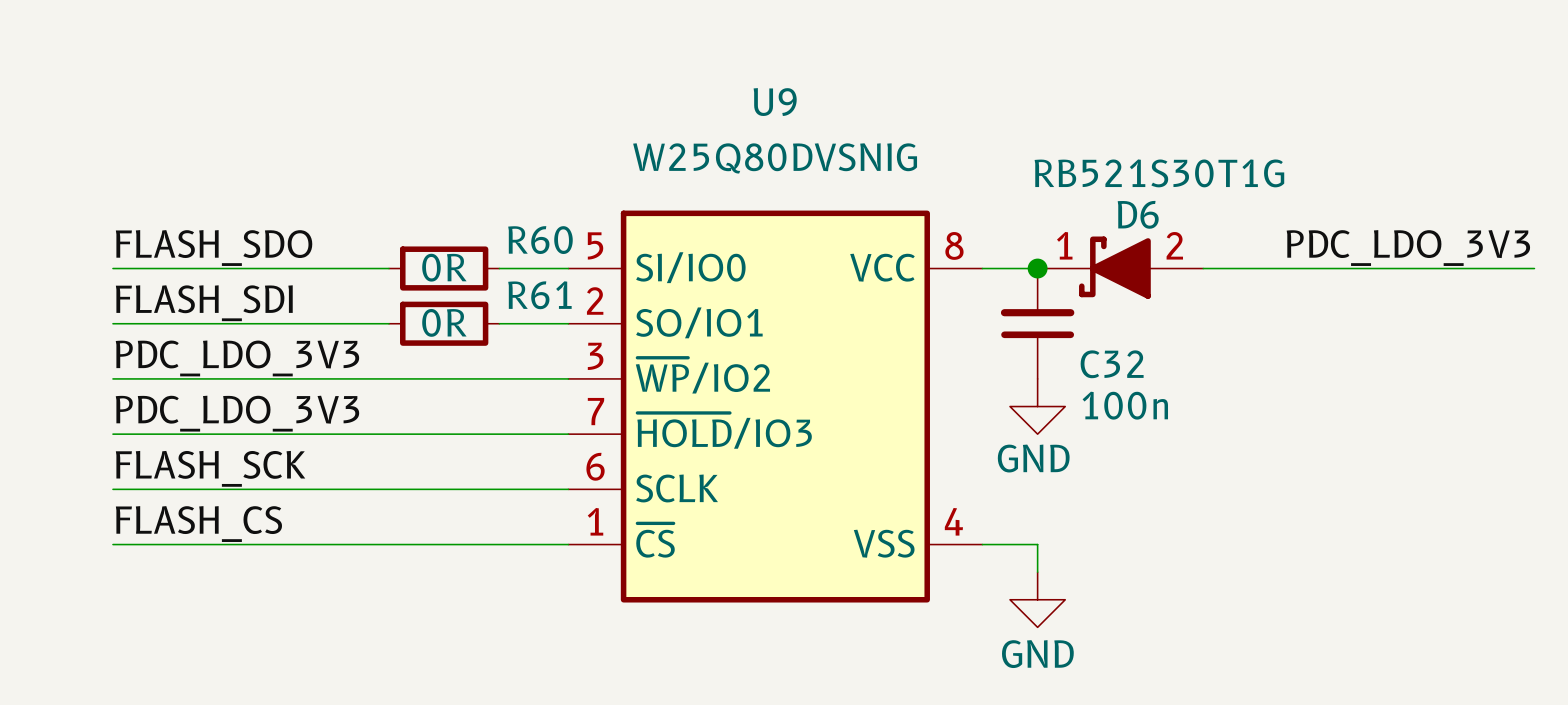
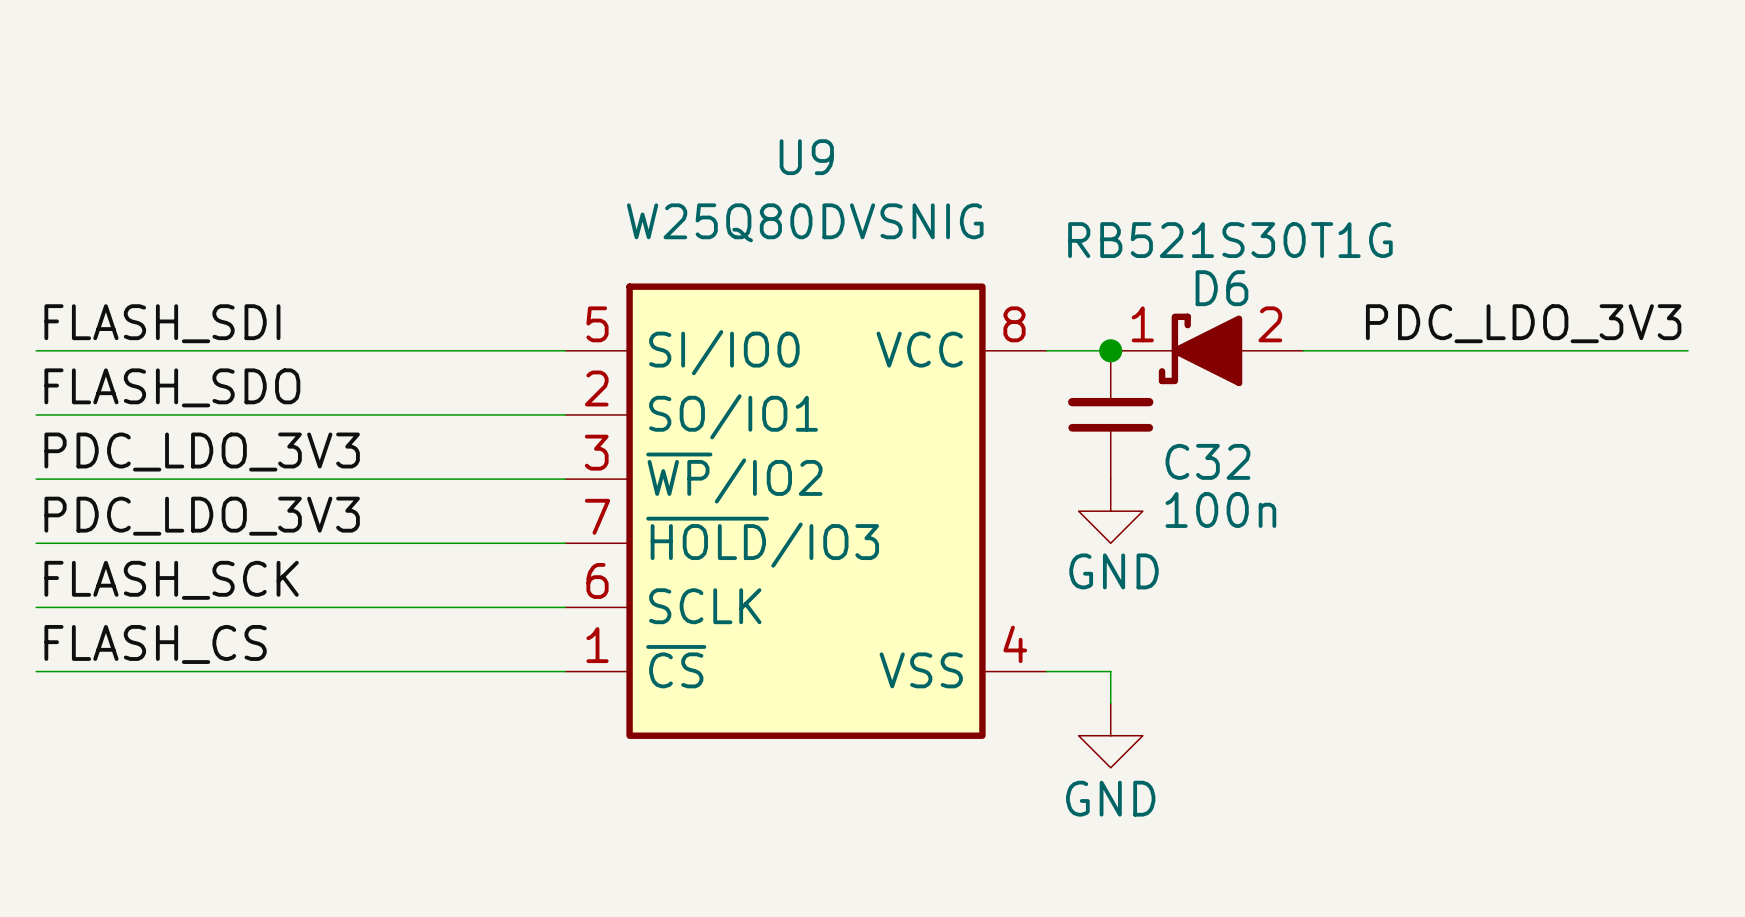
label: FLASH_SDO (214, 248) -> FLASH_SDI (162, 323)
wire: none -> (356, 350) (485, 350)
R60: (444, 268) -> none
label: FLASH_SDI (204, 303) -> FLASH_SDO (172, 387)
wire: none -> (356, 414) (485, 414)
R61: (444, 323) -> none

